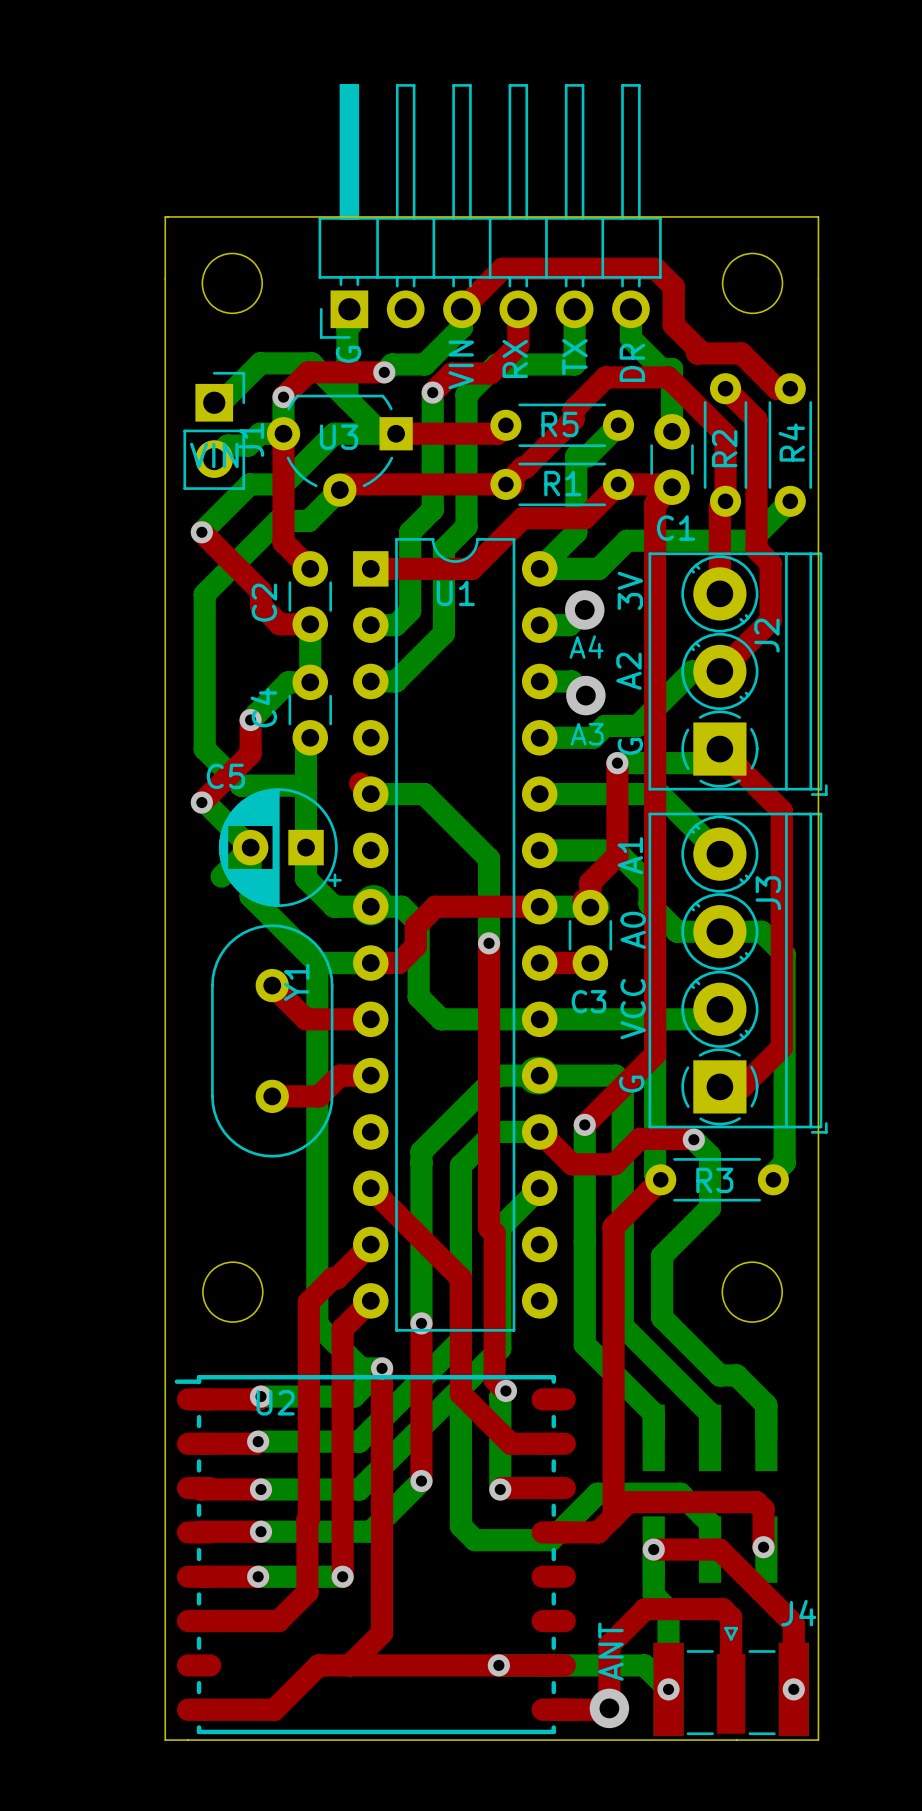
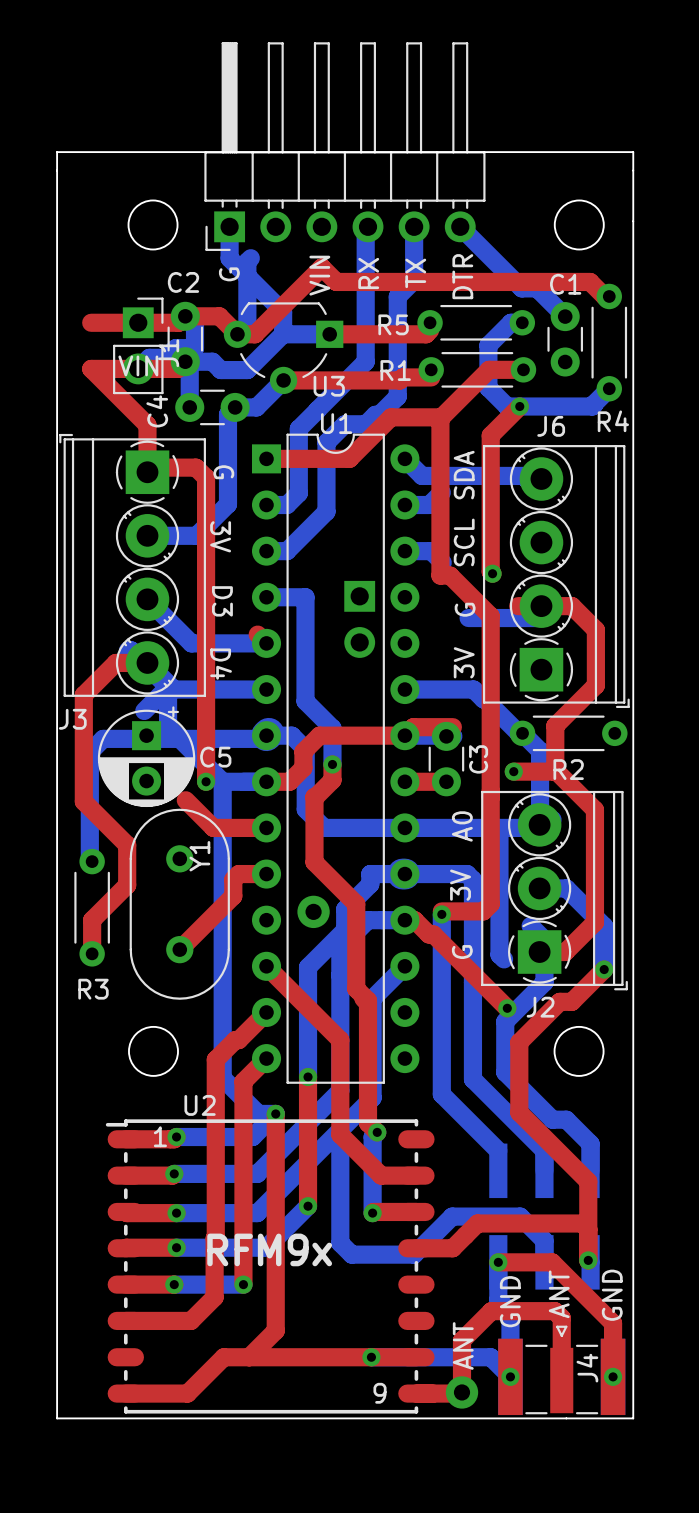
part position: (490, 211) -> (344, 146)
board edge: (818, 216) (165, 216) (165, 1740) -> (633, 170) (633, 152) (57, 152) (57, 1418) (98, 1418)
bottom track: none -> (229, 226) (229, 258) (283, 311) (283, 334)
bottom track: none -> (460, 226) (521, 288) (538, 288) (565, 316)
bottom track: (462, 309) (462, 327) (424, 364) (392, 364) (384, 372) -> none
top track: (462, 309) (502, 268) (655, 268) (673, 286) (673, 325) (697, 348) (697, 353) (741, 353) (776, 388) (790, 388) -> none
top track: (518, 309) (518, 345) (490, 373) (451, 373) (432, 392) -> none
bottom track: (574, 309) (574, 364) (496, 364) (466, 394) (466, 526) -> (414, 226) (414, 280) (397, 296) (397, 396) (379, 414) (375, 414) (365, 424) (344, 424)
bottom track: (630, 309) (630, 338) (661, 368) (672, 368) (672, 431) -> none
text position: G (348, 354) -> G (229, 274)
text position: TX (574, 357) -> TX (415, 273)
text position: RX (515, 358) -> RX (368, 273)
text: DR (632, 362) -> DTR (462, 276)
text position: VIN (461, 364) -> VIN (319, 275)
top track: none -> (609, 296) (604, 296) (590, 281) (336, 281) (321, 267) (254, 334) (237, 334) (219, 316) (185, 316) (178, 322) (91, 322)
top track: (384, 372) (308, 372) (283, 397) -> none
via: (384, 372) -> none
top track: (725, 388) (756, 419) (756, 549) (770, 563) (770, 620) (719, 671) -> none
bottom track: (432, 392) (432, 509) -> (368, 226) (365, 229) (365, 361) (317, 410)
via: (432, 392) -> none
via: (283, 397) -> none
bottom track: (214, 402) (221, 402) (260, 363) (311, 363) (382, 433) -> none
bottom track: none -> (522, 322) (511, 322) (488, 345) (488, 387) (507, 406) (592, 406) (609, 388)
top track: none -> (430, 330) (426, 334) (329, 334) (332, 331)
bottom track: none -> (283, 334) (329, 334)
bottom track: none -> (283, 334) (247, 370) (220, 370) (212, 361) (185, 361) (189, 366) (189, 407)
R5 name position: R5 (559, 424) -> R5 (393, 324)
top track: (505, 425) (497, 433) (396, 433) -> none
R5 position: (562, 425) -> (476, 322)
bottom track: (618, 425) (587, 456) (576, 456) (576, 532) (539, 568) (598, 568) (626, 540) (750, 540) (790, 501) -> none
top track: (283, 433) (283, 542) (310, 568) -> none
bottom track: (396, 433) (334, 433) (283, 484) (249, 484) (201, 532) -> none
U3 name position: U3 (338, 437) -> U3 (329, 386)
R4 name rotation: 0° (791, 442) -> 90° clockwise (613, 421)
R4 name position: R4 (791, 442) -> R4 (613, 421)
R2 rotation: 0° (725, 445) -> 90° clockwise (568, 733)
R2 position: (725, 445) -> (568, 733)
R4 position: (790, 445) -> (609, 342)
top track: none -> (185, 361) (178, 368) (91, 368) (147, 425) (147, 472) (152, 467) (195, 467) (206, 477) (206, 781)
U3 position: (339, 450) -> (283, 348)
C1 position: (672, 459) -> (565, 339)
top track: none -> (431, 377) (402, 377) (399, 380) (283, 380)
bottom track: none -> (283, 380) (256, 407) (235, 407) (227, 414) (227, 504) (196, 535) (147, 535)
R1 name position: R1 (562, 483) -> R1 (395, 370)
top track: (505, 484) (573, 419) (573, 409) (605, 377) (668, 377) (725, 434) (725, 501) (719, 506) (719, 593) -> none
top track: (513, 484) (345, 484) (339, 490) -> none
R1 position: (562, 484) -> (477, 369)
bottom track: (339, 490) (308, 521) (277, 521) (204, 594) (204, 749) (241, 785) (306, 785) -> none
top track: none -> (519, 406) (490, 435) (490, 571) (492, 573)
via: none -> (519, 406)
top track: none -> (440, 417) (440, 575) (450, 575) (490, 616) (490, 904) (483, 911) (441, 911)
top track: (584, 518) (618, 484) (669, 484) (672, 487) (655, 504) (655, 1054) (584, 1124) -> (441, 417) (489, 369) (523, 369)
C1 name position: C1 (675, 528) -> C1 (565, 284)
top track: (201, 532) (260, 591) (260, 605) (279, 624) (310, 624) -> none
via: (201, 532) -> none
bottom track: none -> (404, 458) (421, 475) (523, 475) (526, 478) (541, 478)
text: none -> G (223, 472)
text: 3V (630, 590) -> SDA (464, 475)
U1 name position: U1 (455, 593) -> U1 (336, 423)
C2 position: (310, 596) -> (185, 339)
C2 name rotation: 0° (264, 602) -> 90° clockwise (183, 282)
C2 name position: C2 (264, 602) -> C2 (183, 282)
via: (584, 609) -> none
bottom track: (310, 624) (310, 682) (288, 682) (250, 720) -> none
J2 name rotation: 0° (766, 635) -> 90° clockwise (540, 1007)
J2 name position: J2 (766, 635) -> J2 (540, 1007)
text: A4 (586, 647) -> none
text: none -> 3V (220, 536)
text: A2 (628, 671) -> SCL (464, 542)
bottom track: (719, 671) (692, 671) (637, 725) (605, 725) (593, 737) (539, 737) -> none
J2 position: (738, 674) -> (554, 890)
via: (585, 695) -> none
C4 rotation: 0° (310, 710) -> 90° clockwise (212, 407)
C4 position: (310, 710) -> (212, 407)
J6: none -> (556, 576)
top track: (250, 720) (250, 753) (201, 802) -> none
via: (250, 720) -> none
text: A3 (587, 734) -> none
bottom track: (310, 737) (306, 742) (306, 878) (334, 906) (367, 906) -> none
bottom track: none -> (266, 597) (305, 597) (305, 701) (332, 728) (332, 764)
text: none -> D3 (222, 601)
text position: G (630, 746) -> G (465, 609)
top track: none -> (518, 606) (572, 606) (595, 630) (595, 685) (555, 725) (555, 770)
top track: (719, 749) (781, 811) (781, 1047) (742, 1086) (719, 1086) -> none
top track: (617, 763) (617, 855) (590, 882) (590, 907) (583, 900) -> none
via position: (617, 763) -> (492, 573)
part: none -> (359, 619)
C5 name position: C5 (225, 776) -> C5 (215, 757)
bottom track: (370, 794) (424, 794) (489, 858) (489, 943) -> (266, 643) (191, 643) (147, 599)
bottom track: (539, 794) (659, 794) (719, 854) -> none
via: (201, 802) -> none
bottom track: none -> (147, 662) (174, 689) (266, 689)
top track: none -> (147, 662) (115, 662) (83, 695) (83, 801) (127, 844) (127, 885) (92, 920) (92, 953)
text: none -> 3V (464, 662)
text: none -> D4 (221, 664)
C5 rotation: 0° (280, 847) -> 90° counterclockwise (146, 756)
C5 position: (280, 847) -> (146, 756)
bottom track: (615, 850) (649, 884) (649, 903) (677, 931) (761, 931) (784, 954) (784, 1162) (773, 1174) (773, 1179) -> (467, 689) (473, 689) (518, 733) (522, 733) (540, 750) (539, 824)
text: A1 (630, 855) -> none
J3 name position: J3 (768, 893) -> J3 (72, 719)
top track: none -> (452, 727) (413, 727) (404, 735)
bottom track: none -> (266, 735) (263, 738) (103, 738) (89, 752) (89, 859) (92, 861)
text position: A0 (633, 930) -> A0 (462, 826)
top track: none -> (332, 764) (332, 780) (314, 797)
top track: (489, 943) (489, 1227) -> none
via position: (489, 943) -> (332, 764)
top track: none -> (555, 770) (594, 809) (594, 922) (565, 952) (539, 952)
top track: none -> (555, 770) (513, 771)
via: none -> (513, 771)
via: none -> (206, 781)
J3 rotation: 0° (738, 973) -> 180° (132, 565)
J3 position: (738, 973) -> (132, 565)
top track: none -> (314, 796) (314, 862) (356, 904) (356, 988) (368, 1000) (368, 1003)
C3 name rotation: 0° (588, 1001) -> 90° counterclockwise (478, 759)
C3 name position: C3 (588, 1001) -> C3 (478, 759)
text: VCC (633, 1009) -> none
Y1 position: (272, 1040) -> (179, 904)
top track: (339, 1075) (319, 1096) (272, 1096) -> (241, 874) (233, 879) (233, 896) (179, 949)
bottom track: (497, 1075) (421, 1151) (421, 1189) -> (370, 874) (370, 884) (345, 909) (345, 930) (308, 967)
text position: G (631, 1084) -> G (462, 952)
text: none -> 3V (460, 885)
bottom track: none -> (539, 888) (566, 888) (604, 926) (604, 969)
via: none -> (313, 911)
top track: (539, 1131) (572, 1164) (614, 1164) (639, 1138) (693, 1138) -> (404, 920) (414, 920) (428, 934) (433, 934) (507, 1008)
via: (693, 1139) -> none
top track: (660, 1179) (613, 1227) (613, 1516) -> none
R3 rotation: 0° (717, 1179) -> 90° clockwise (92, 907)
R3 position: (717, 1179) -> (92, 907)
R3 name position: R3 (714, 1180) -> R3 (93, 989)
top track: none -> (604, 969) (571, 1001) (559, 1001) (519, 1042) (519, 1112) (588, 1181) (588, 1229)
via: none -> (604, 969)
via: none -> (507, 1008)
text: none -> 1 (160, 1136)
U2 name position: U2 (275, 1402) -> U2 (200, 1105)
text: none -> RFM9x (269, 1249)
text: none -> ANT (559, 1294)
text: none -> GND (612, 1295)
text: none -> GND (510, 1301)
J4 name rotation: 0° (798, 1613) -> 90° counterclockwise (587, 1368)
J4 name position: J4 (798, 1613) -> J4 (587, 1368)
text: none -> 9 (380, 1393)

